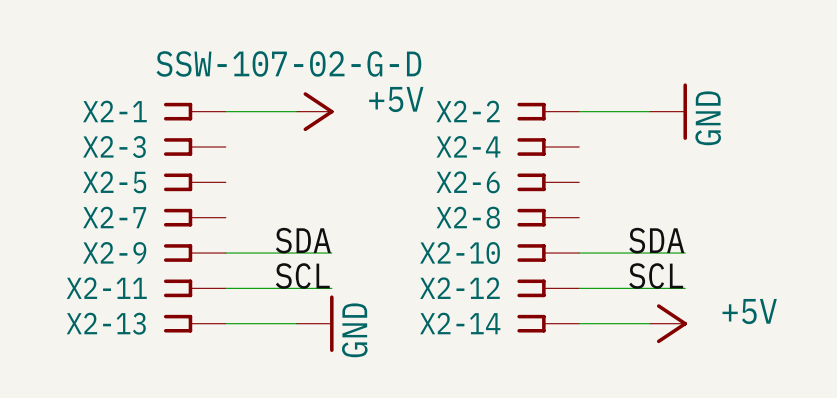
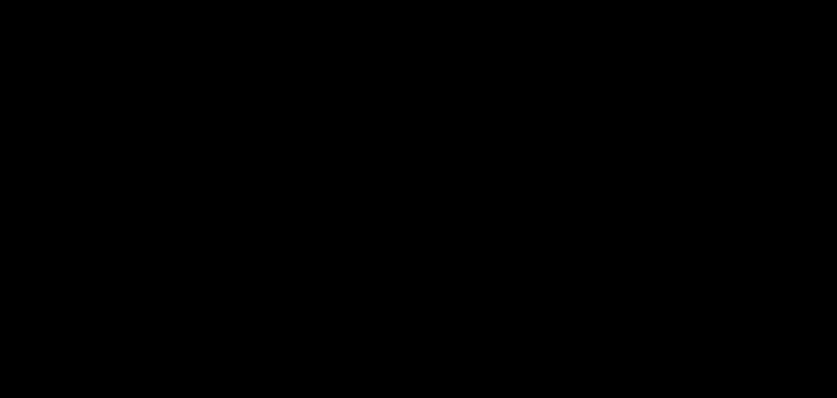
X2-1: SSW-107-02-G-D (194, 111) -> none
wire: (225, 111) (296, 111) -> none
power symbol: +5V (315, 111) -> none
X2-2: (548, 111) -> none
wire: (579, 111) (649, 111) -> none
power symbol: GND (668, 111) -> none
X2-3: (194, 147) -> none
X2-4: (548, 147) -> none
X2-5: (194, 182) -> none
X2-6: (548, 182) -> none
X2-7: (194, 217) -> none
X2-8: (548, 217) -> none
label: SDA (303, 240) -> none
label: SDA (656, 240) -> none
X2-9: (194, 253) -> none
wire: (225, 253) (331, 253) -> none
X2-10: (548, 253) -> none
wire: (579, 253) (685, 253) -> none
label: SCL (302, 275) -> none
label: SCL (656, 275) -> none
X2-11: (194, 288) -> none
wire: (225, 288) (331, 288) -> none
X2-12: (548, 288) -> none
wire: (579, 288) (685, 288) -> none
X2-13: (194, 323) -> none
wire: (225, 323) (296, 323) -> none
power symbol: GND (315, 323) -> none
X2-14: (548, 323) -> none
wire: (579, 323) (649, 323) -> none
power symbol: +5V (668, 323) -> none

